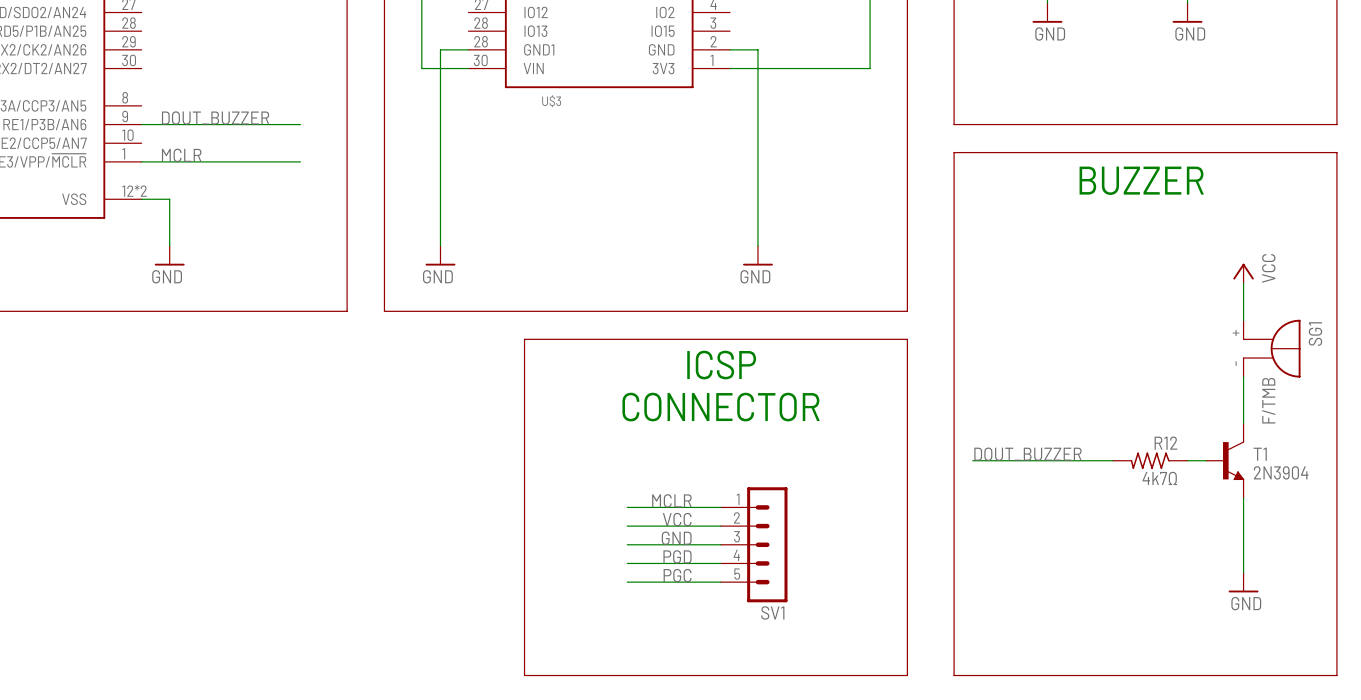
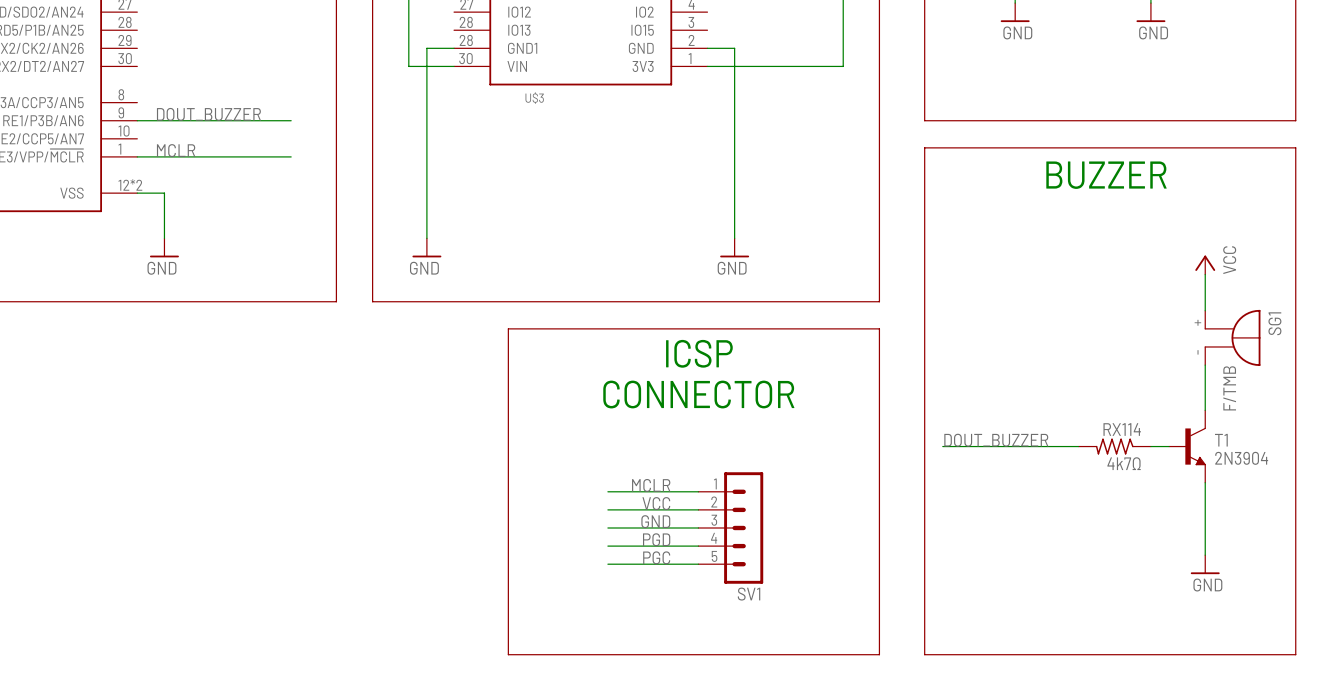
R12 name: R12 (1165, 443) -> RX114 (1122, 429)

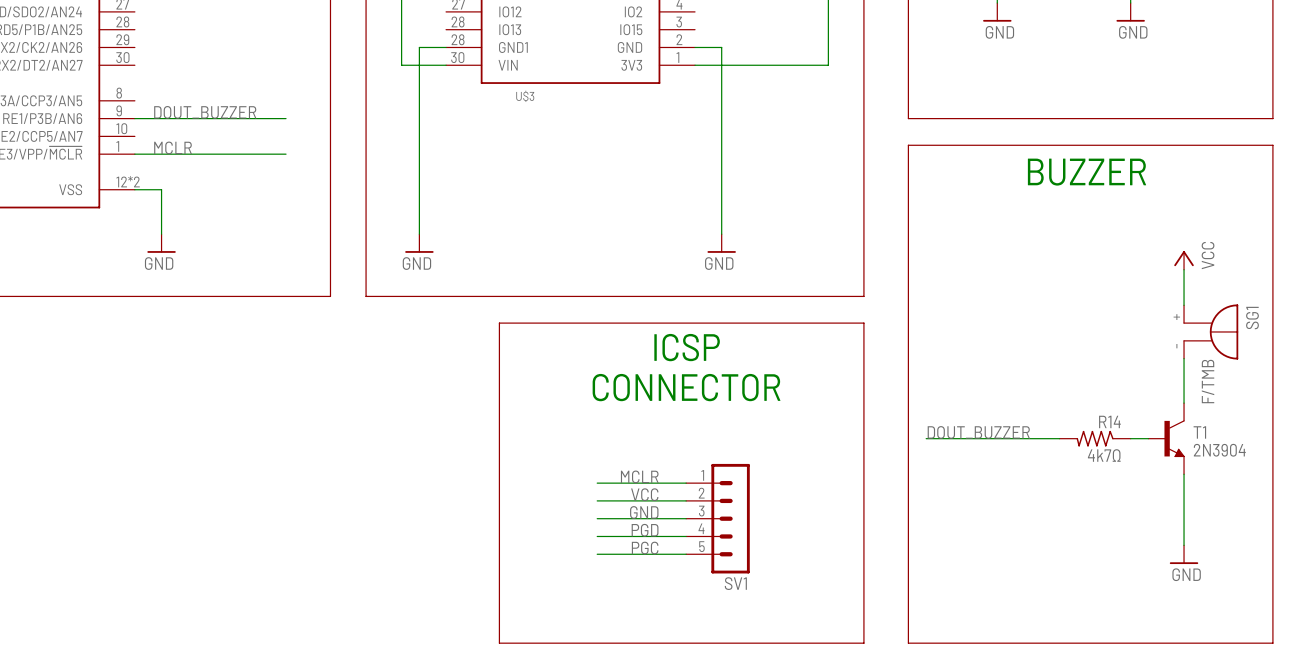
RX114 name: RX114 (1122, 429) -> R14 (1109, 421)

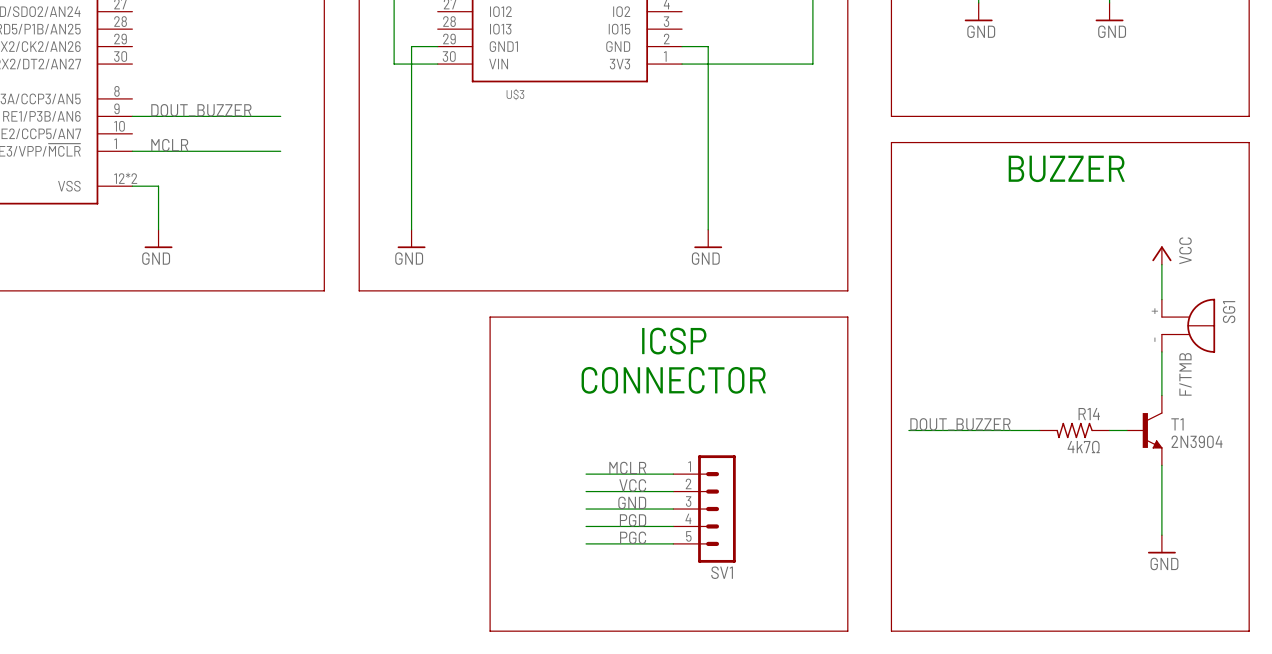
U$3 pin number: 28 (458, 39) -> 29 (449, 39)

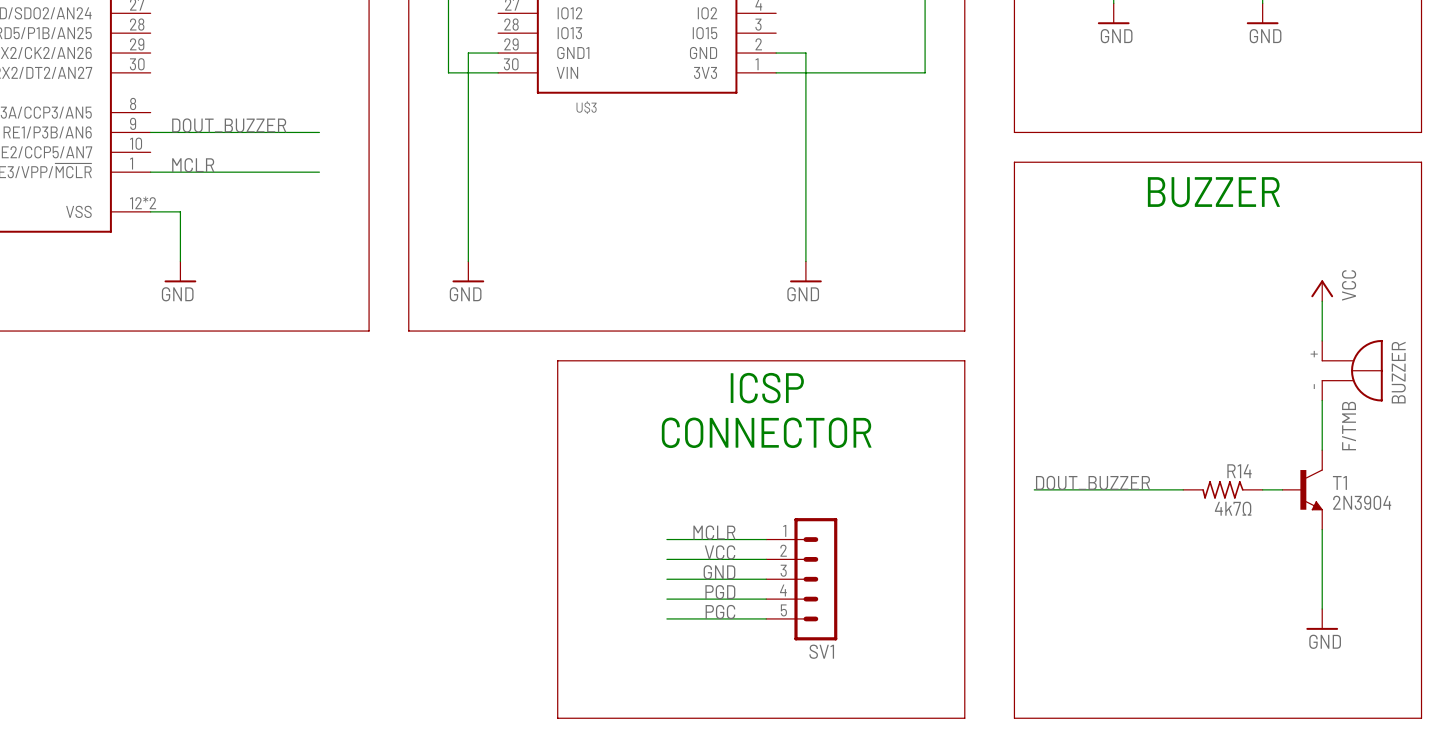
SG1 name: SG1 (1229, 312) -> BUZZER (1398, 372)

